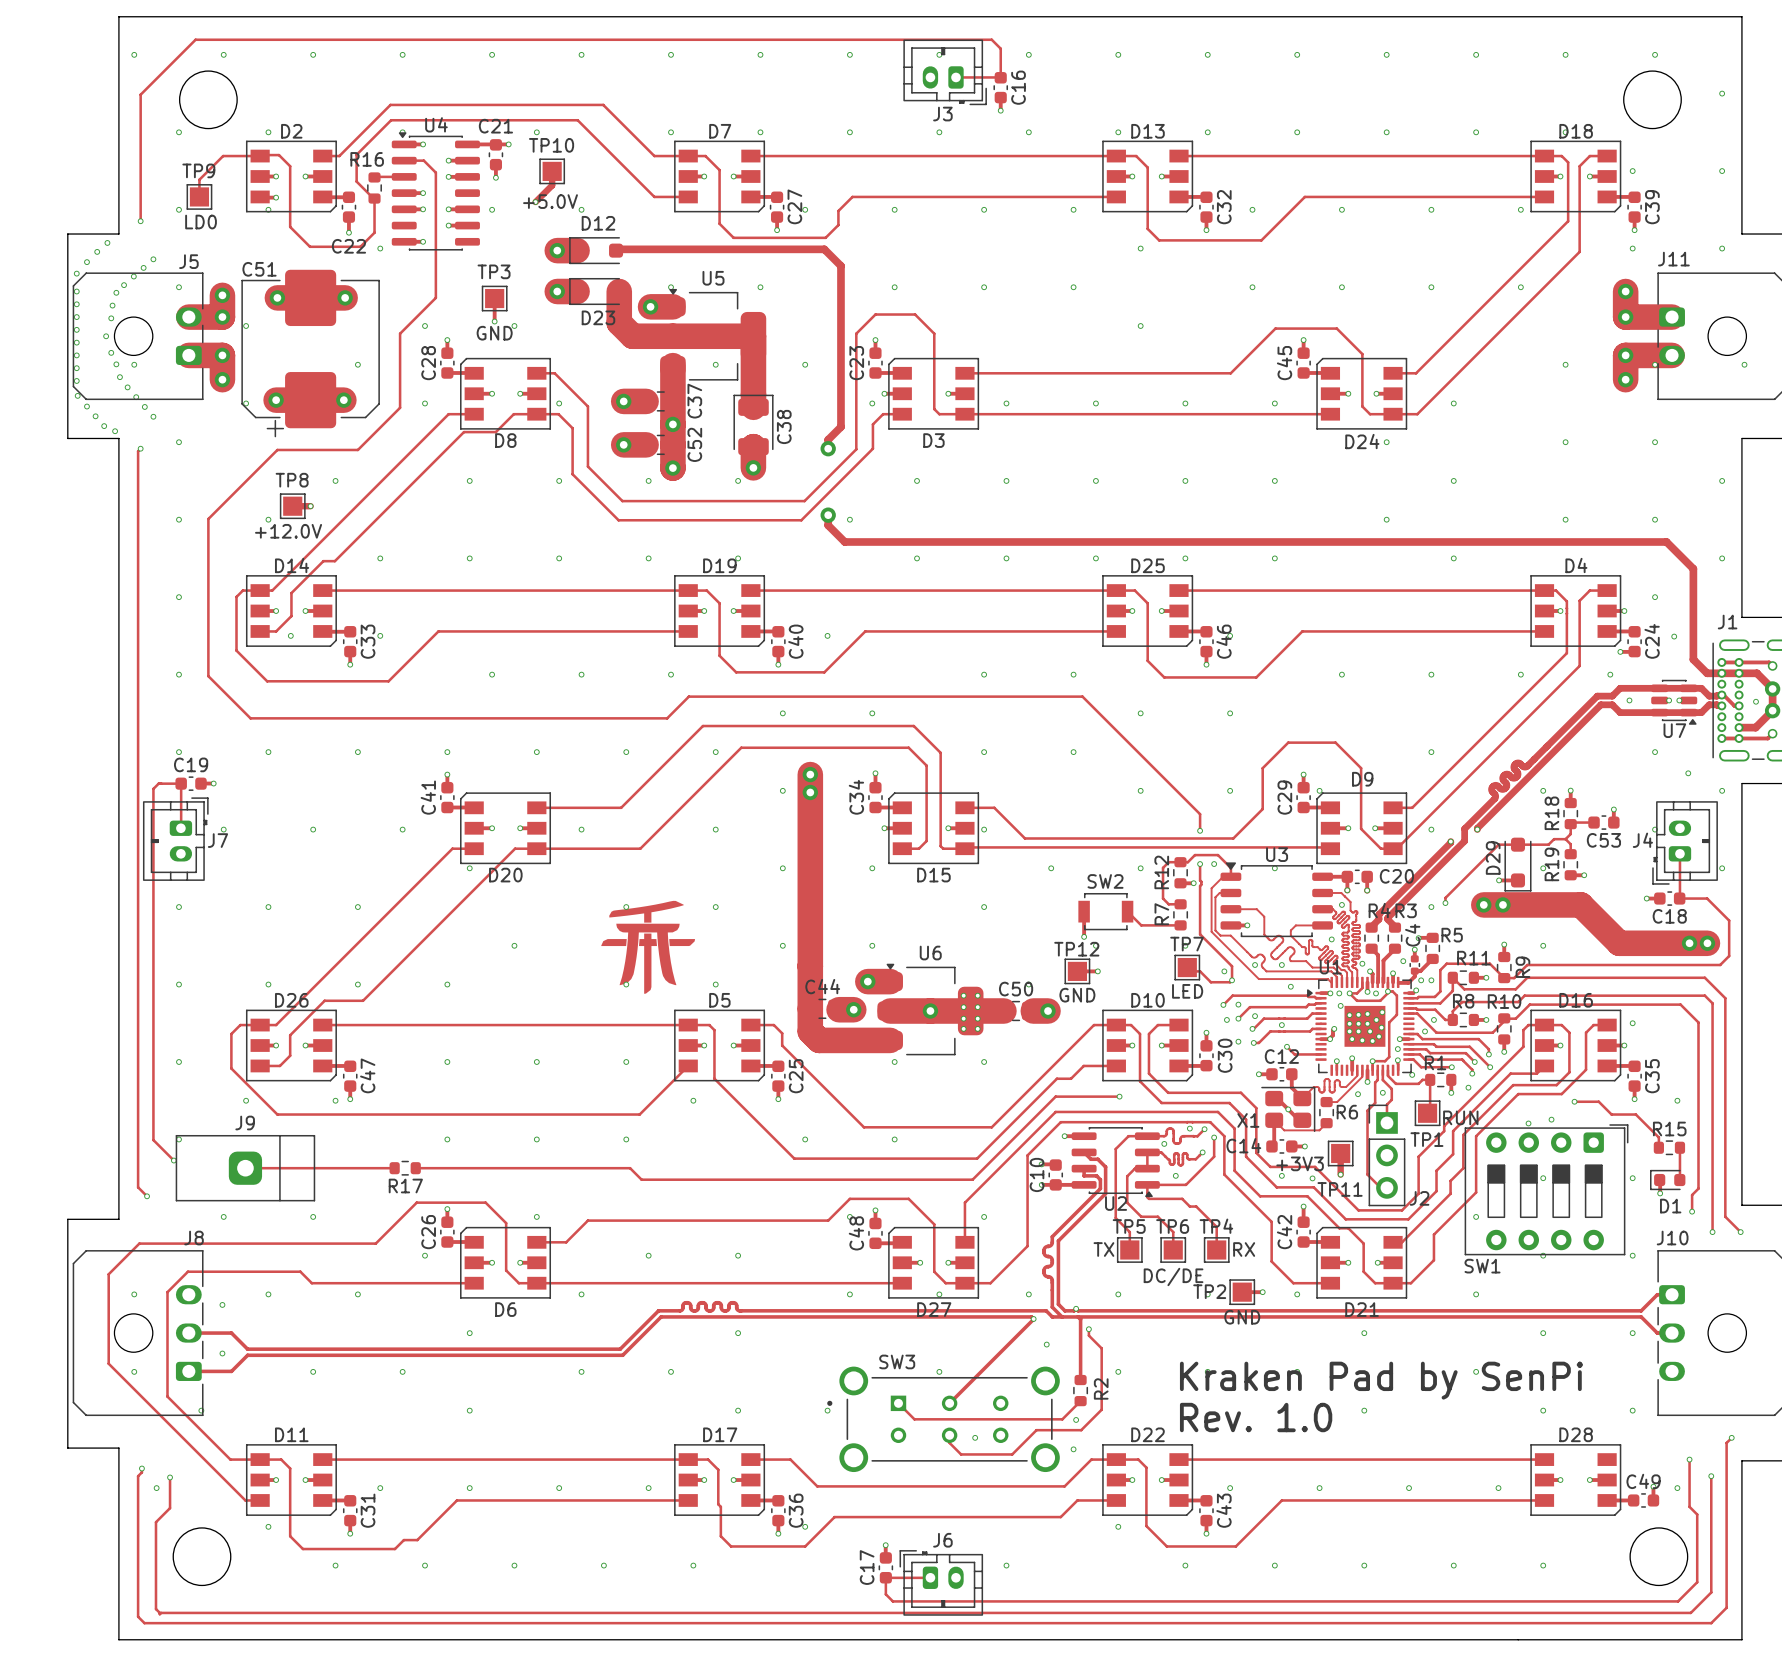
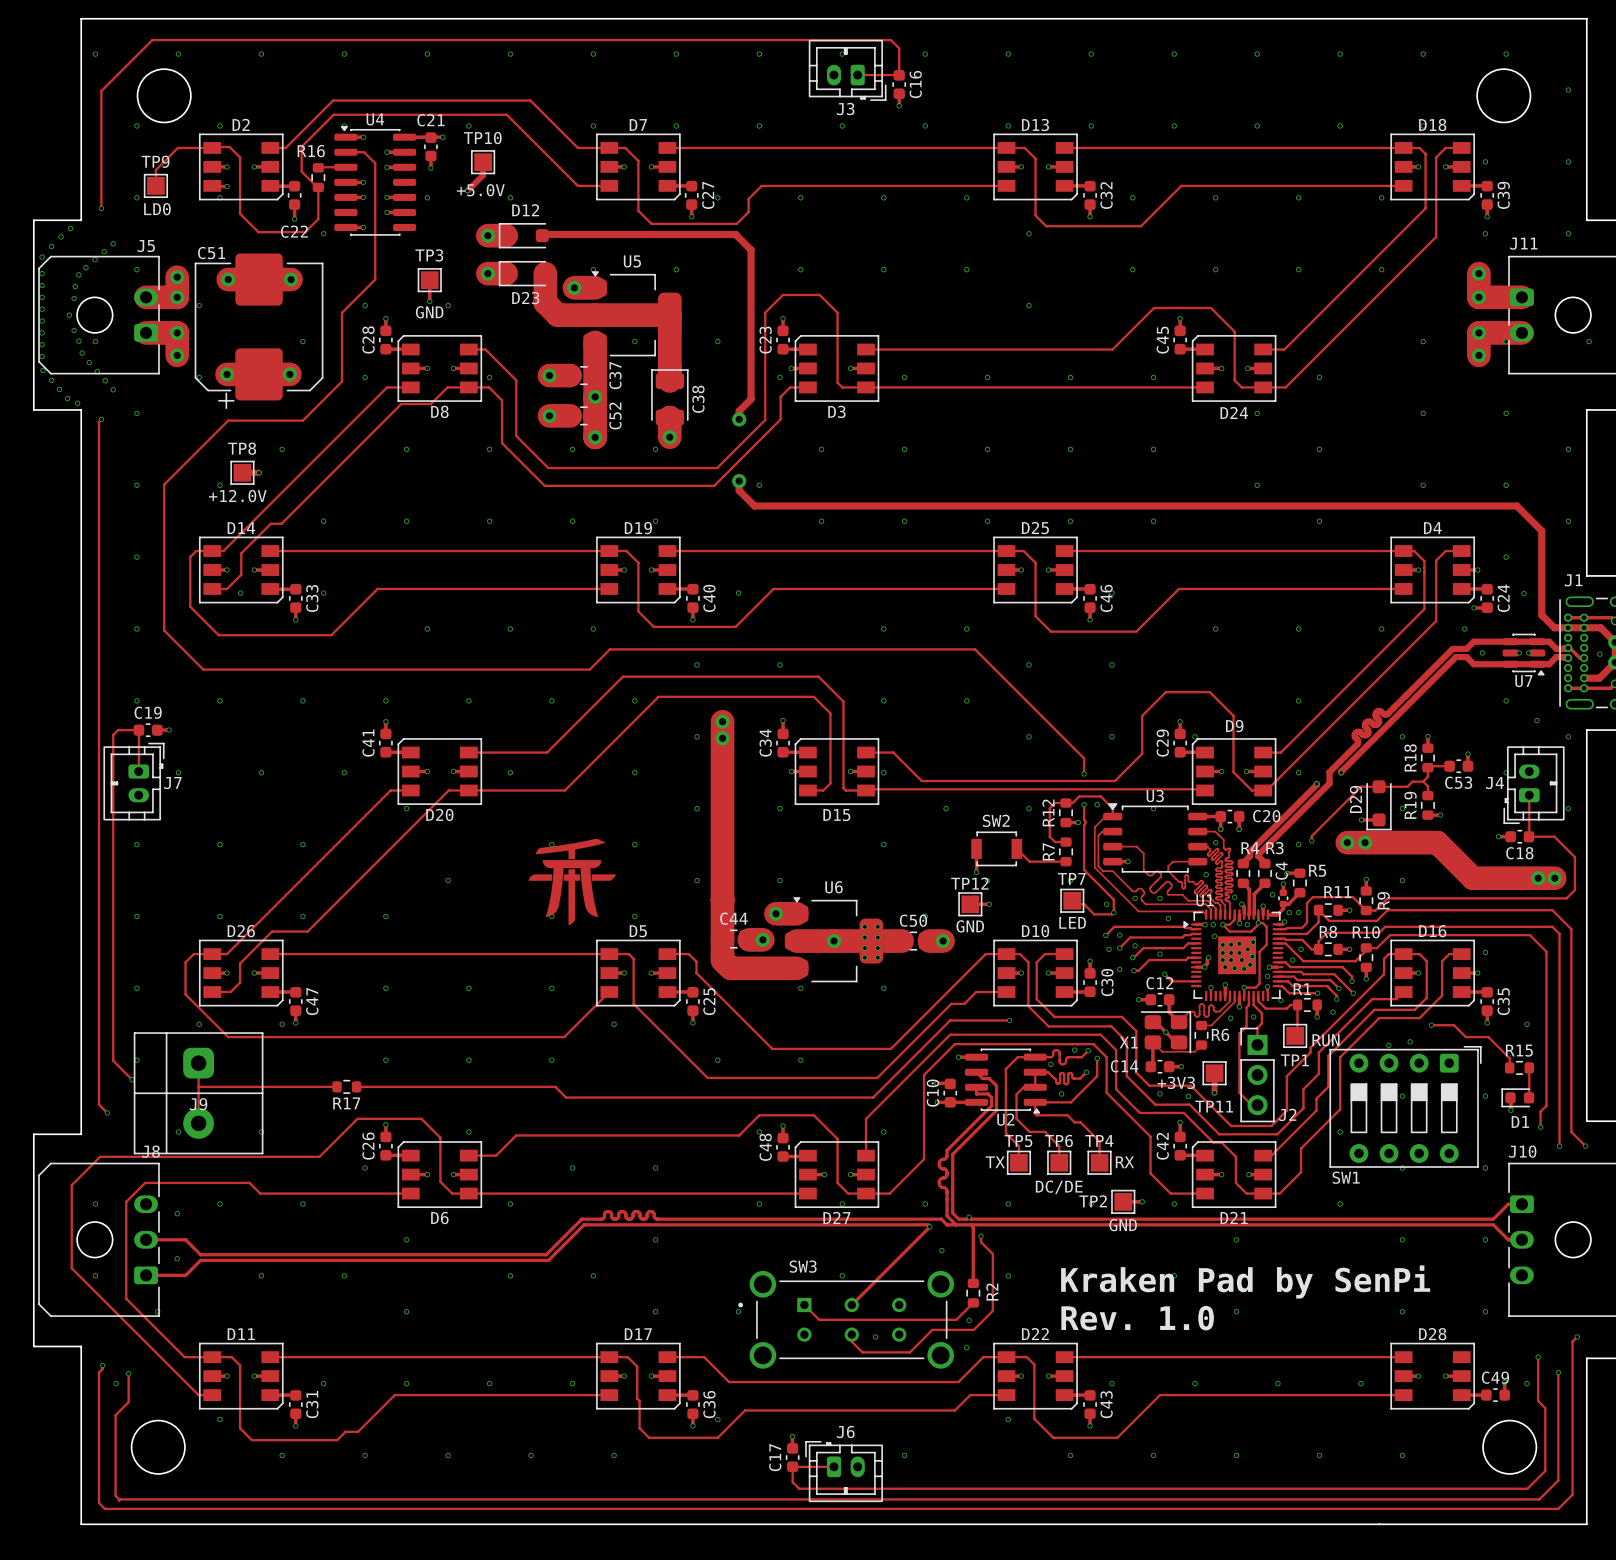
J9 name position: J9 (245, 1122) -> J9 (198, 1104)
J9 footprint: [175, 1134, 316, 1202] -> [133, 1032, 264, 1155]
track: none -> (198, 1063) (198, 1123)

